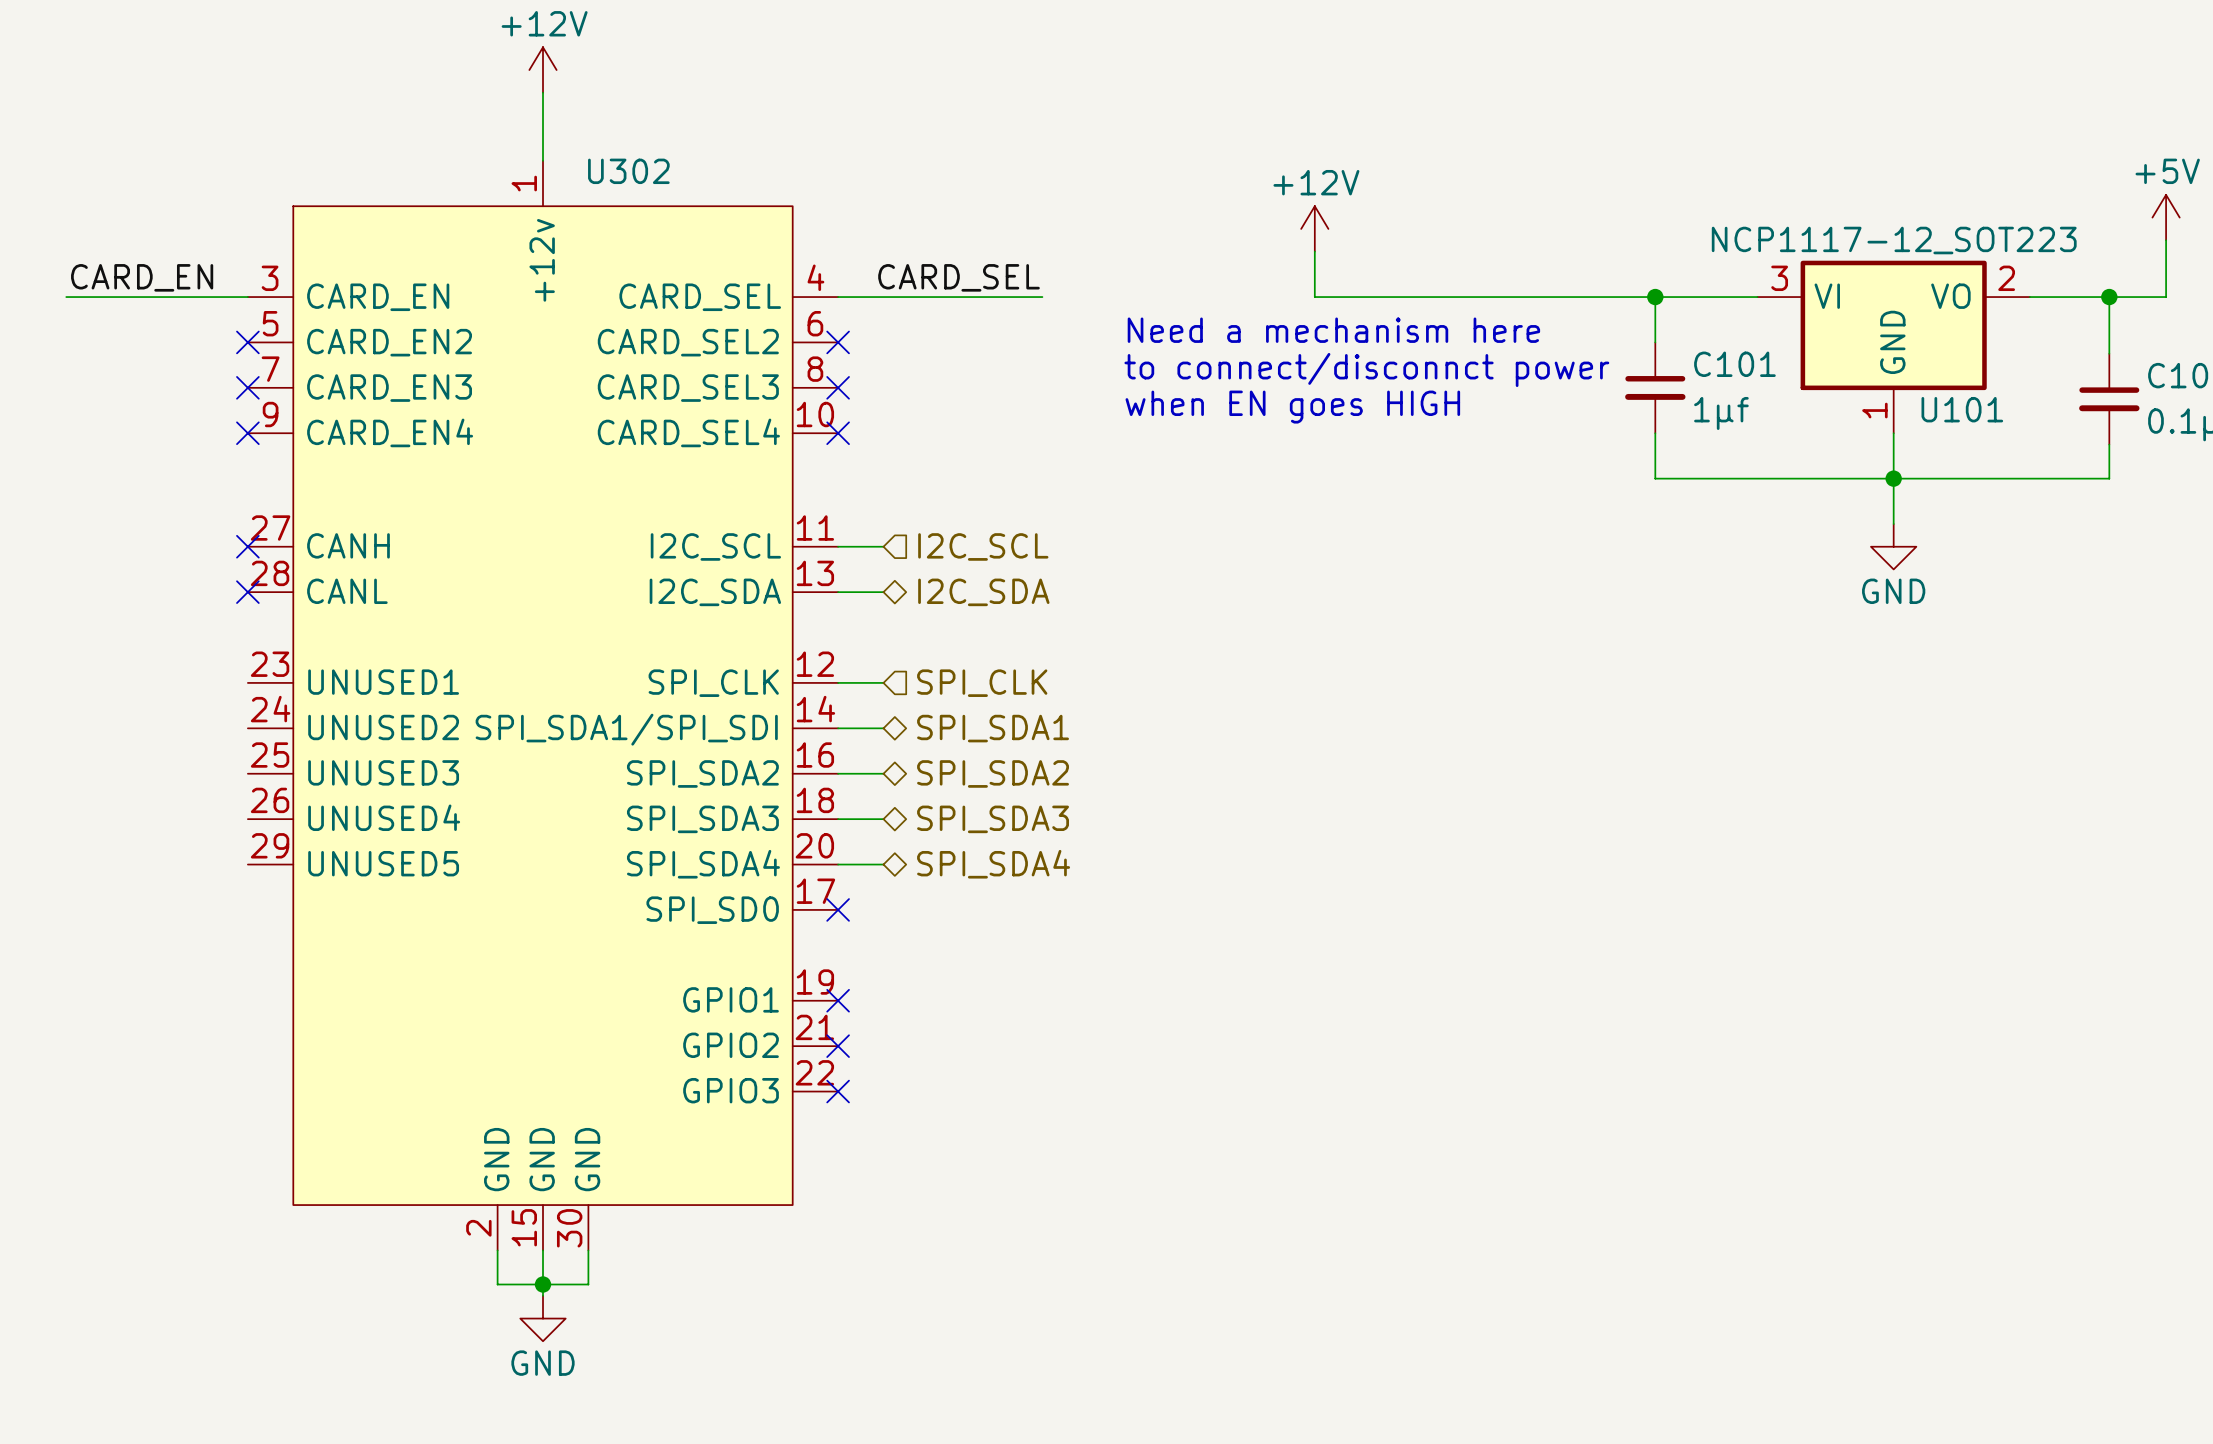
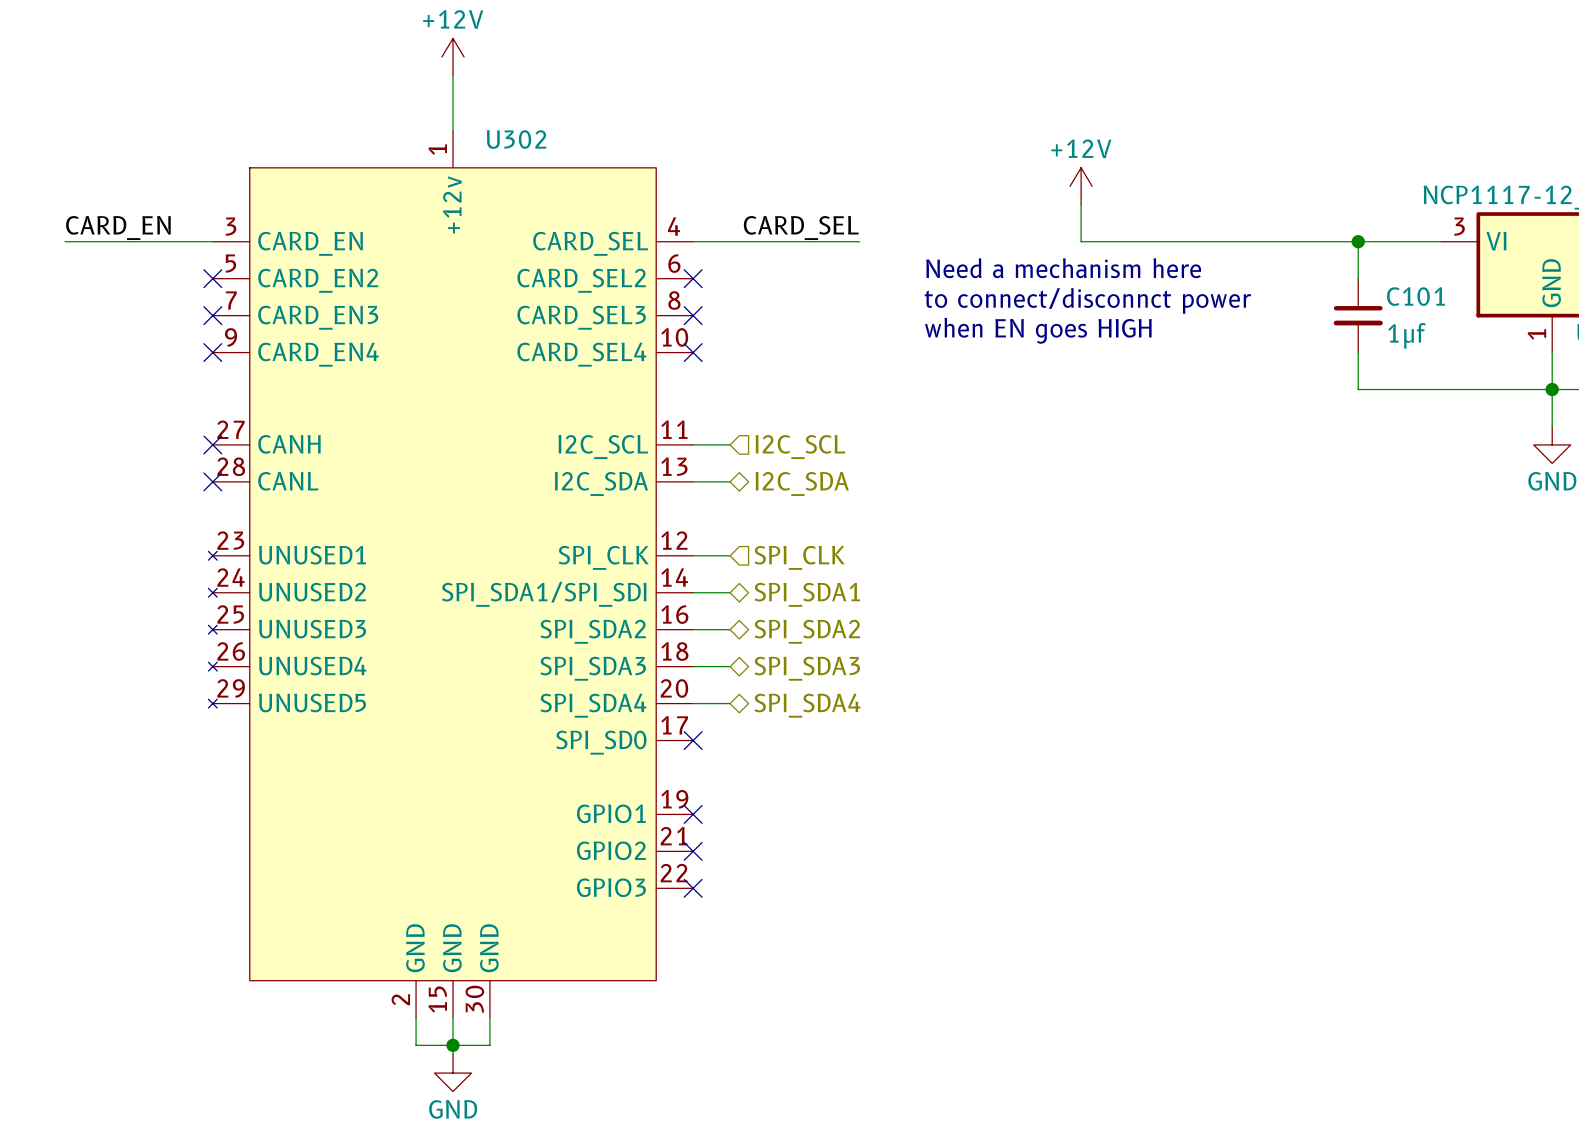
U302 symbol: [247, 160, 839, 1251] -> [208, 130, 694, 1018]

